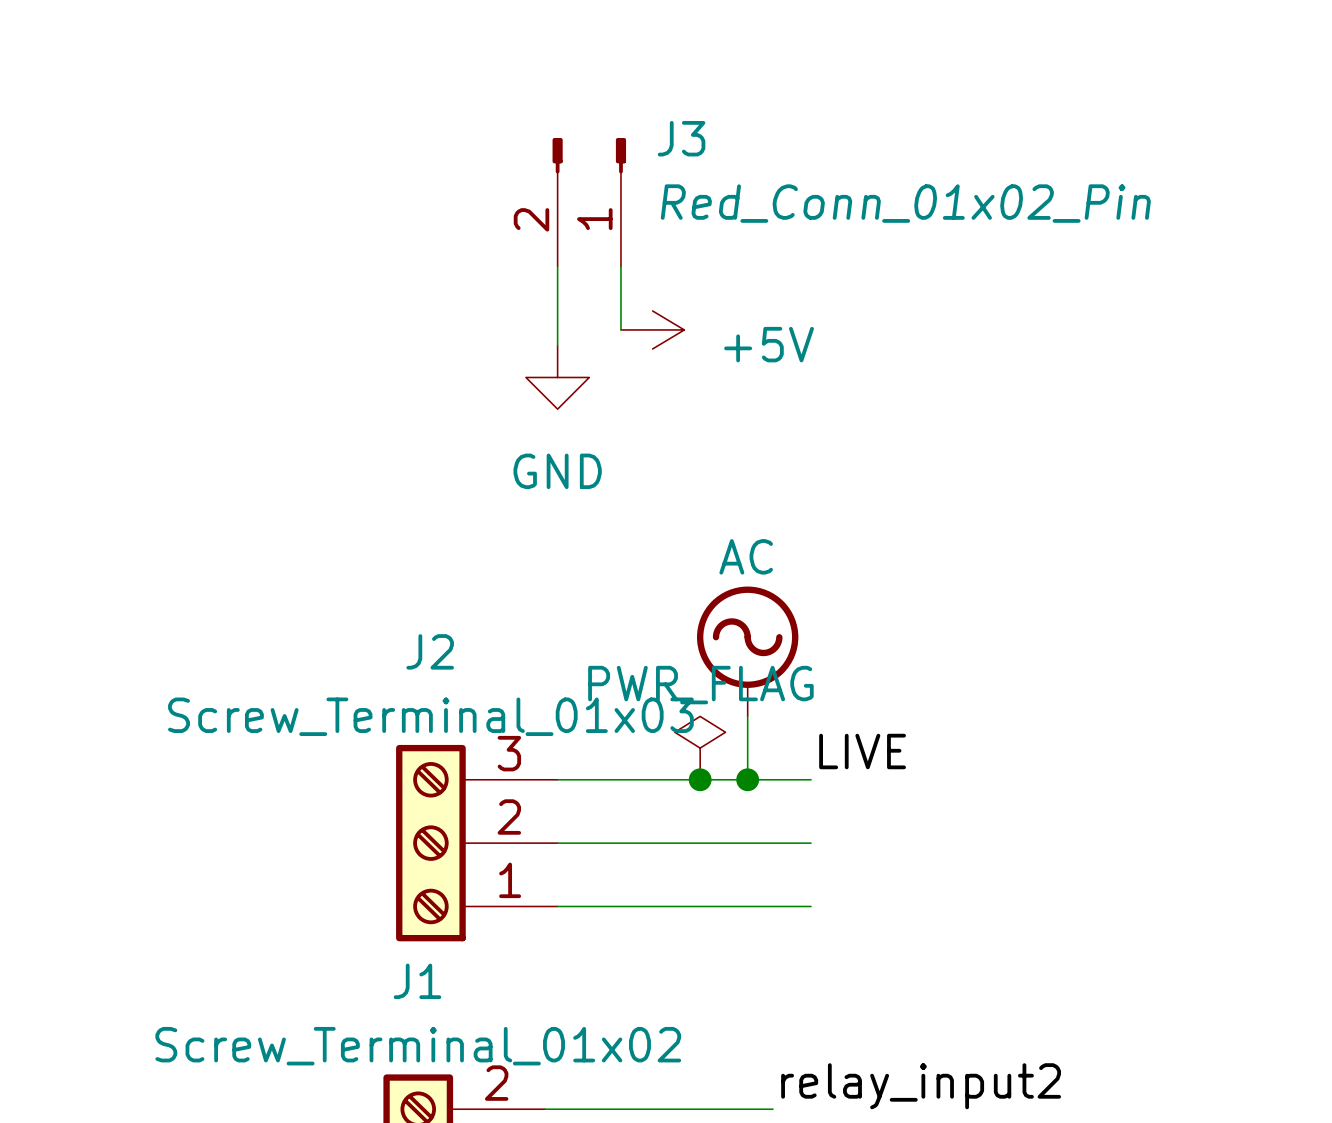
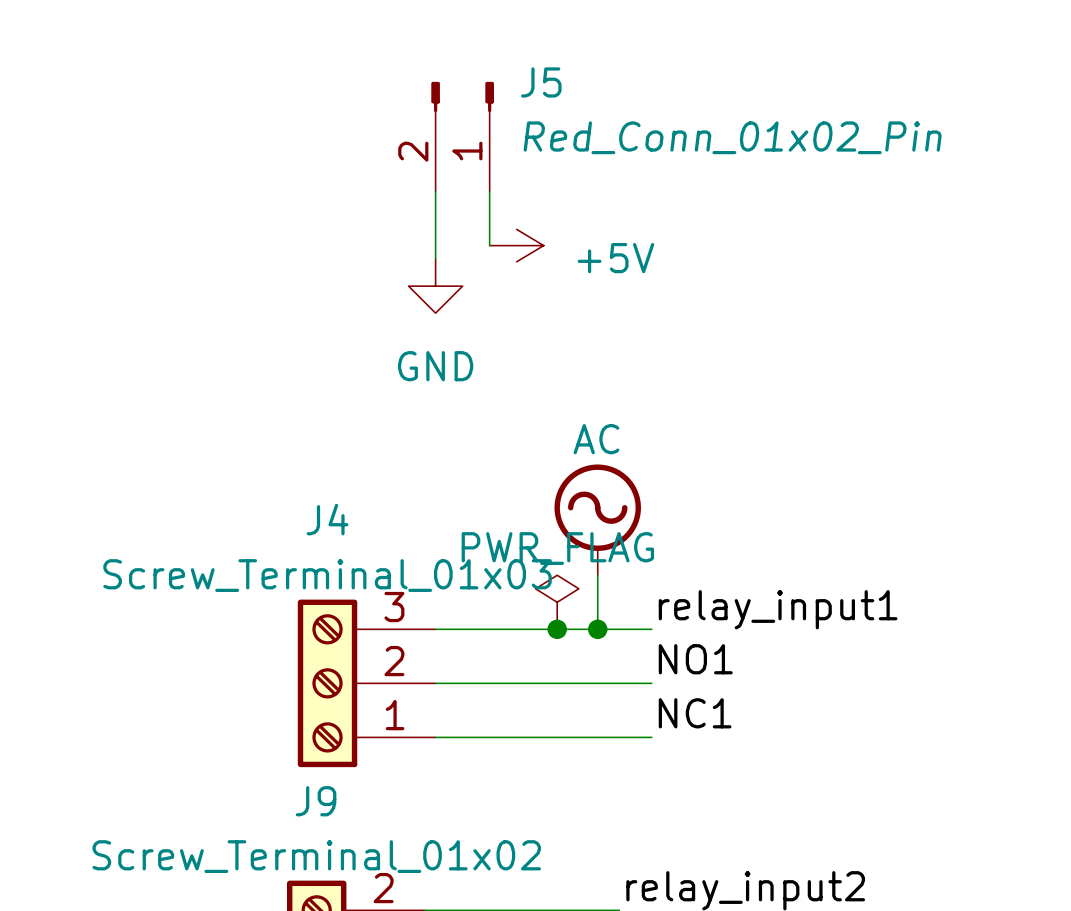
J3 name: J3 (681, 138) -> J5 (541, 82)
J2 name: J2 (430, 651) -> J4 (327, 519)
label: LIVE (862, 751) -> relay_input1 (778, 609)
label: none -> NO1 (695, 659)
label: none -> NC1 (695, 713)
J1 name: J1 (417, 981) -> J9 (316, 801)

